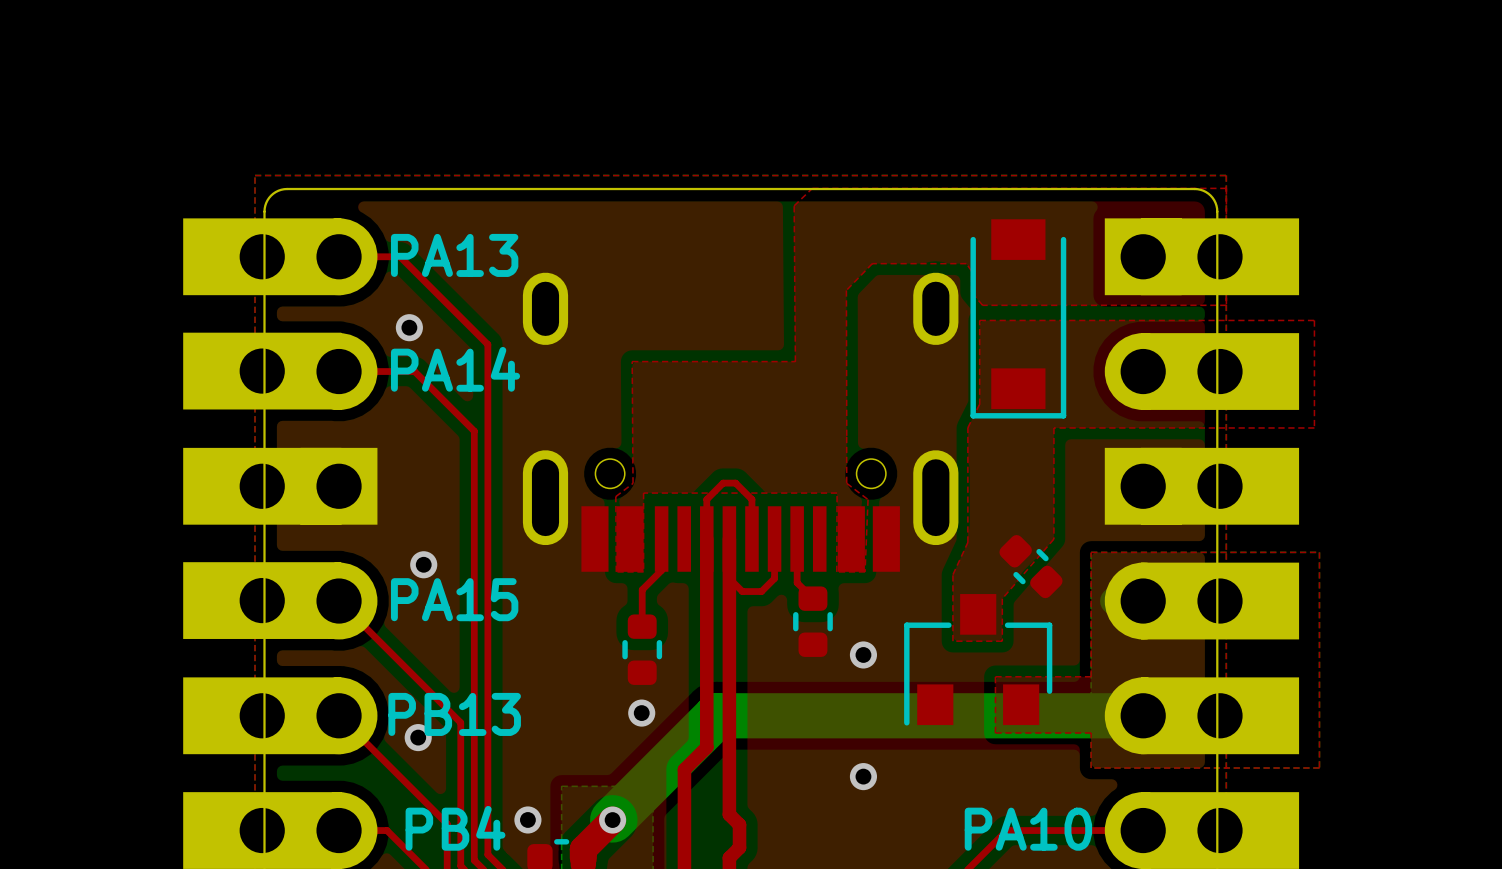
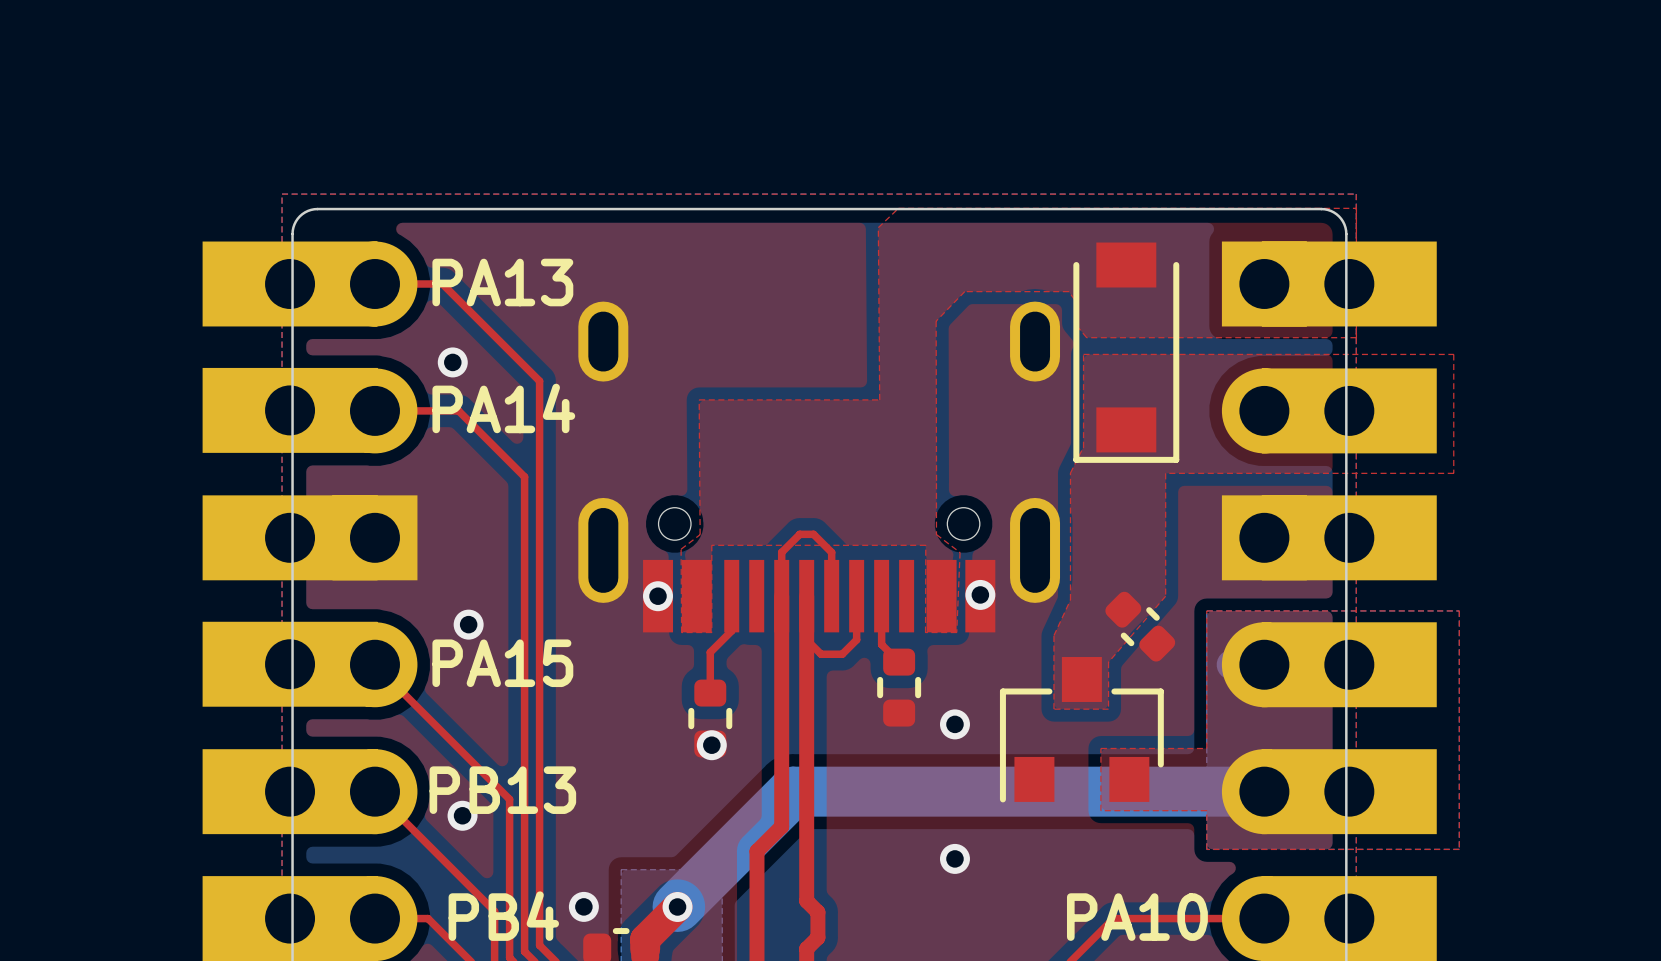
via: none -> (980, 594)
via: none -> (658, 596)
via position: (641, 713) -> (711, 745)

